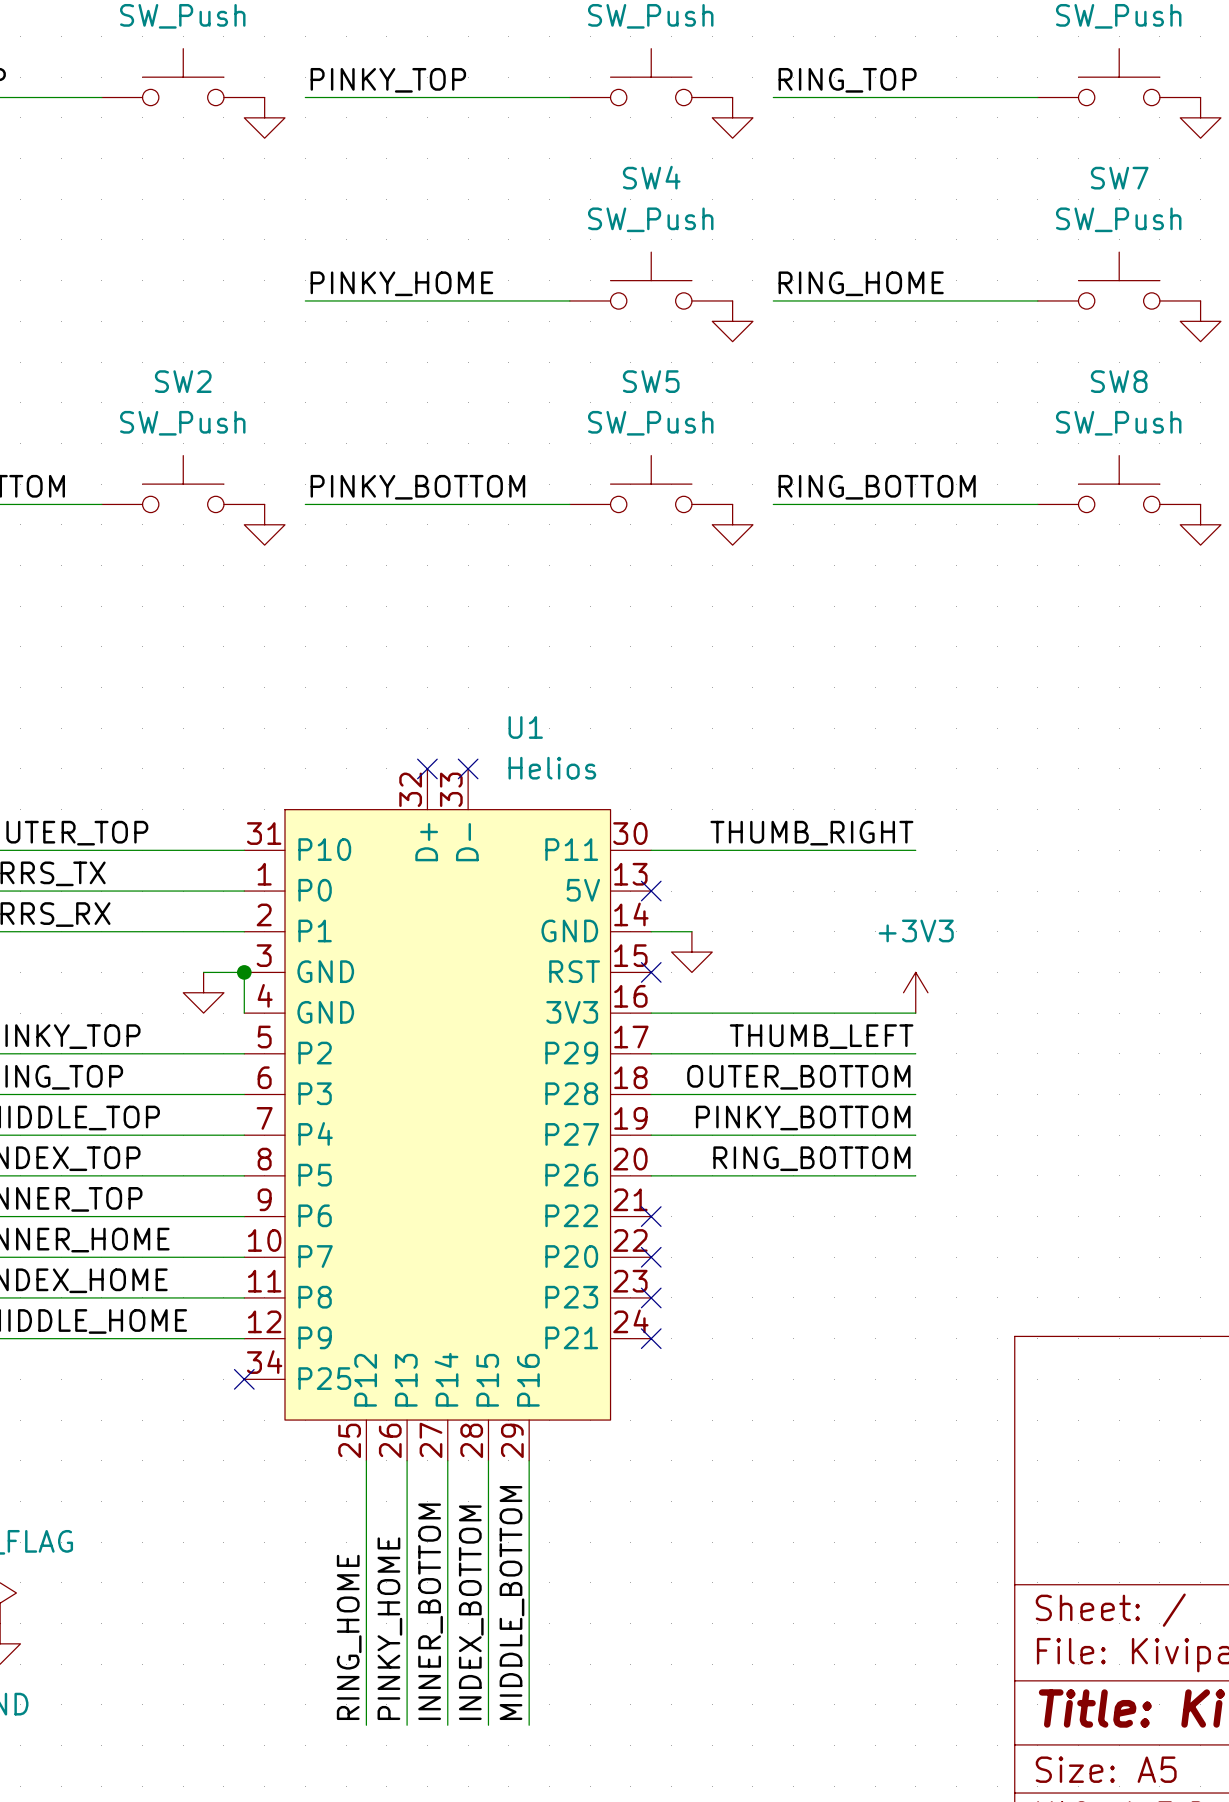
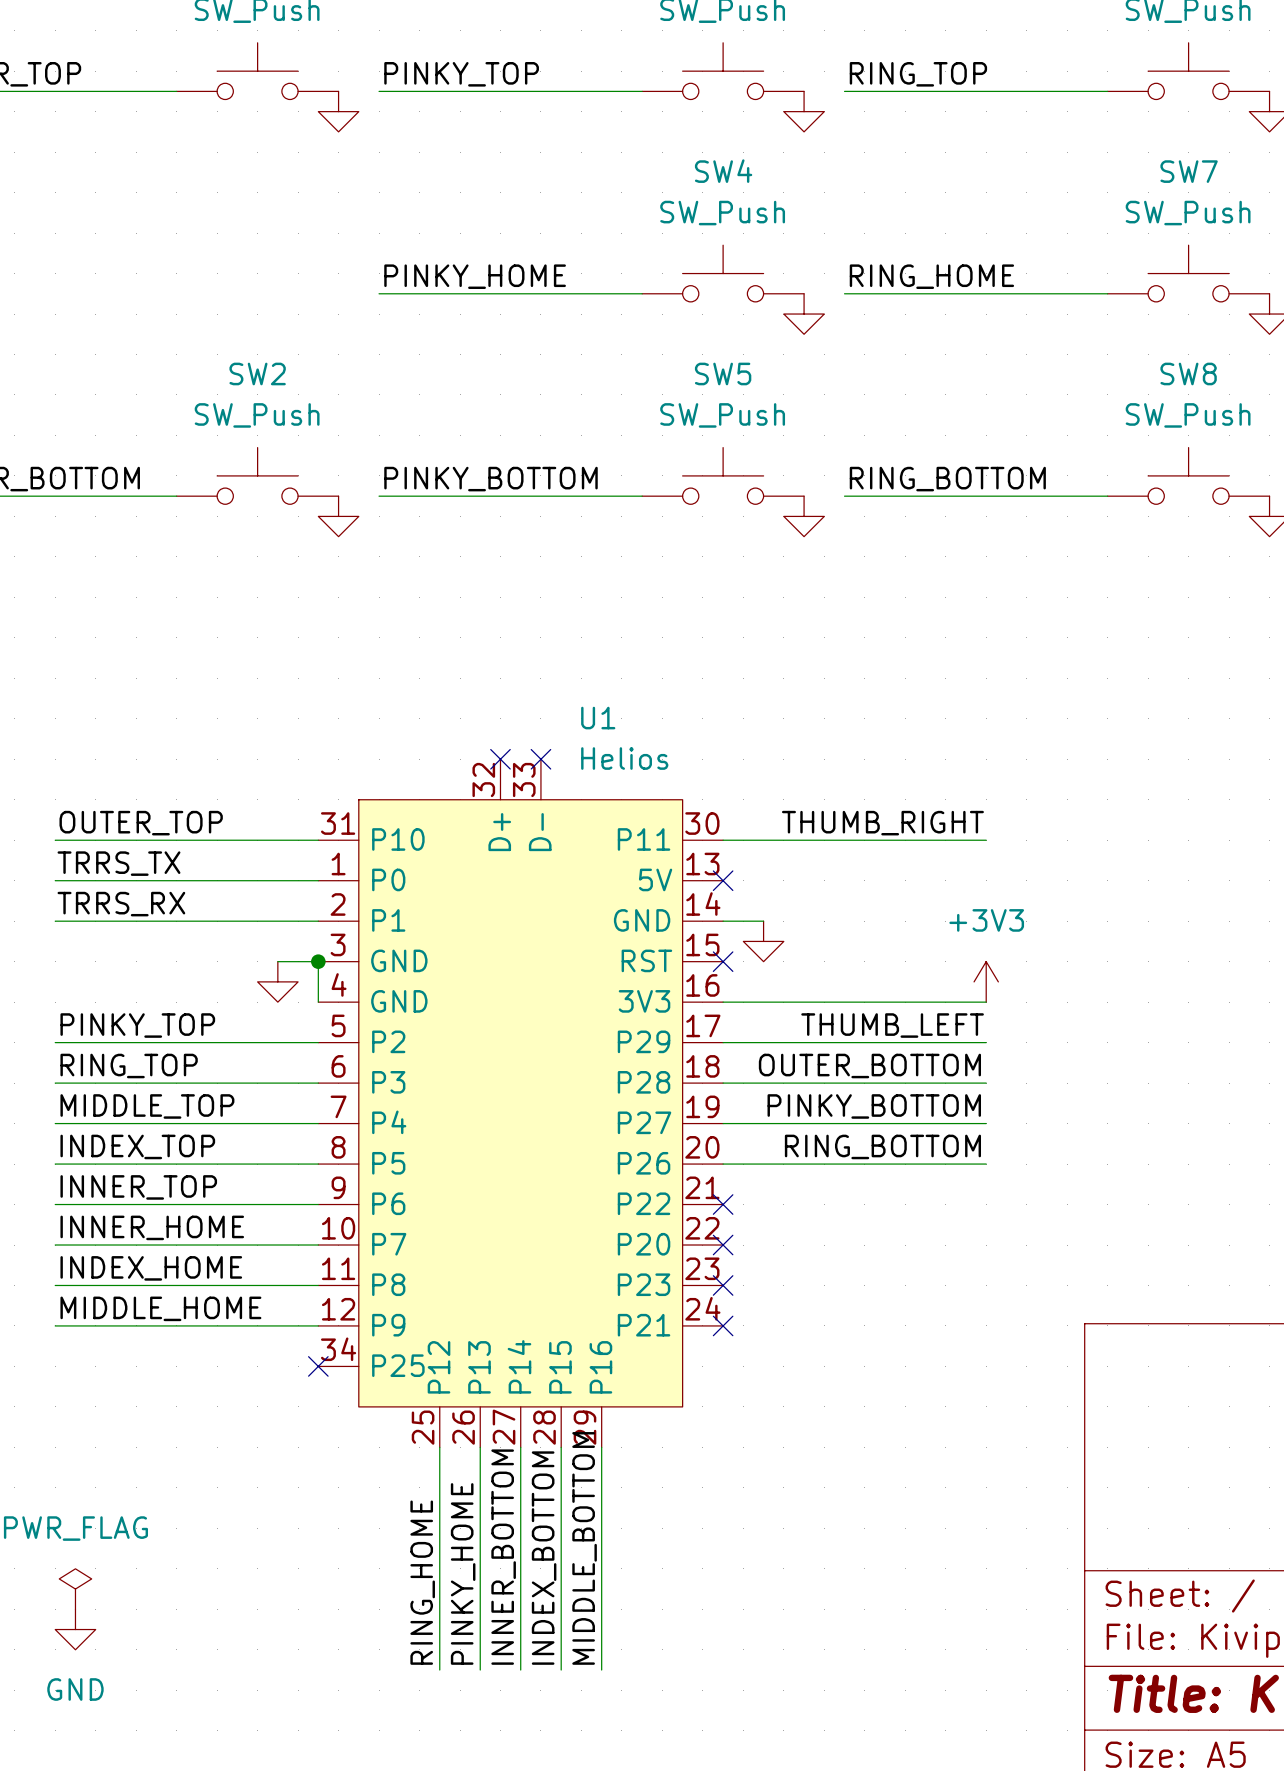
label position: MIDDLE_BOTTOM (511, 1603) -> MIDDLE_BOTTOM (584, 1548)
label position: INNER_BOTTOM (430, 1611) -> INNER_BOTTOM (503, 1557)
label position: INDEX_BOTTOM (471, 1612) -> INDEX_BOTTOM (544, 1558)
label position: PINKY_HOME (389, 1628) -> PINKY_HOME (463, 1573)
label position: RING_HOME (349, 1637) -> RING_HOME (422, 1582)
wire: (366, 1684) (366, 1725) -> none
wire: (407, 1684) (407, 1725) -> none
wire: (447, 1684) (447, 1725) -> none
wire: (488, 1684) (488, 1725) -> none
wire: (529, 1684) (529, 1725) -> none

